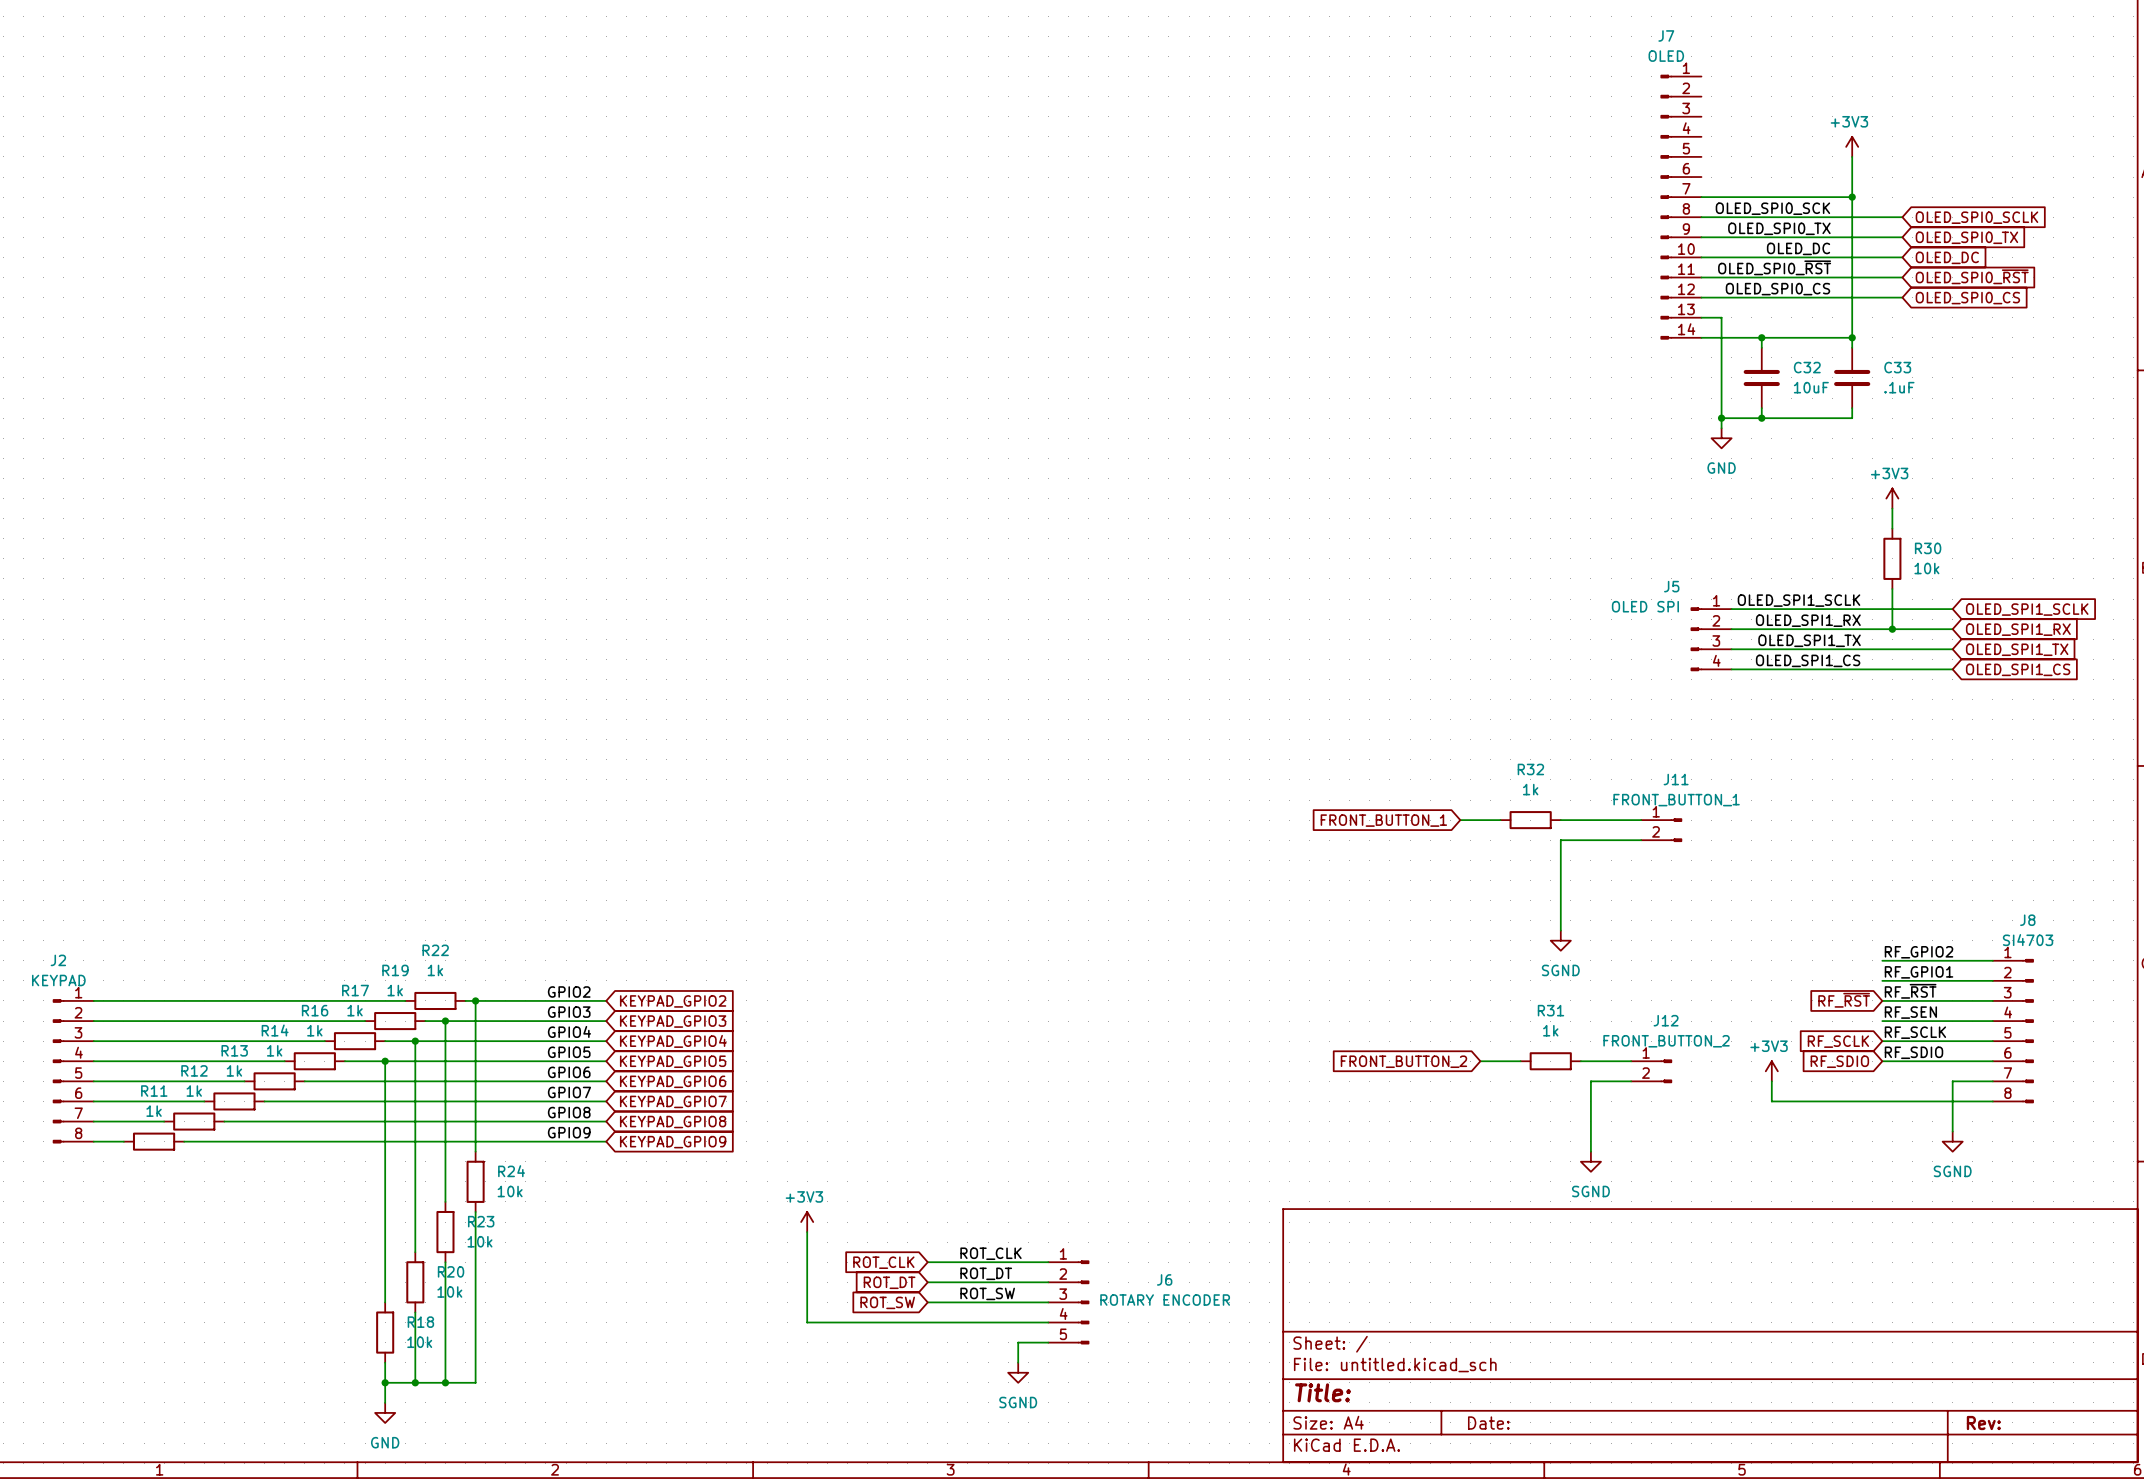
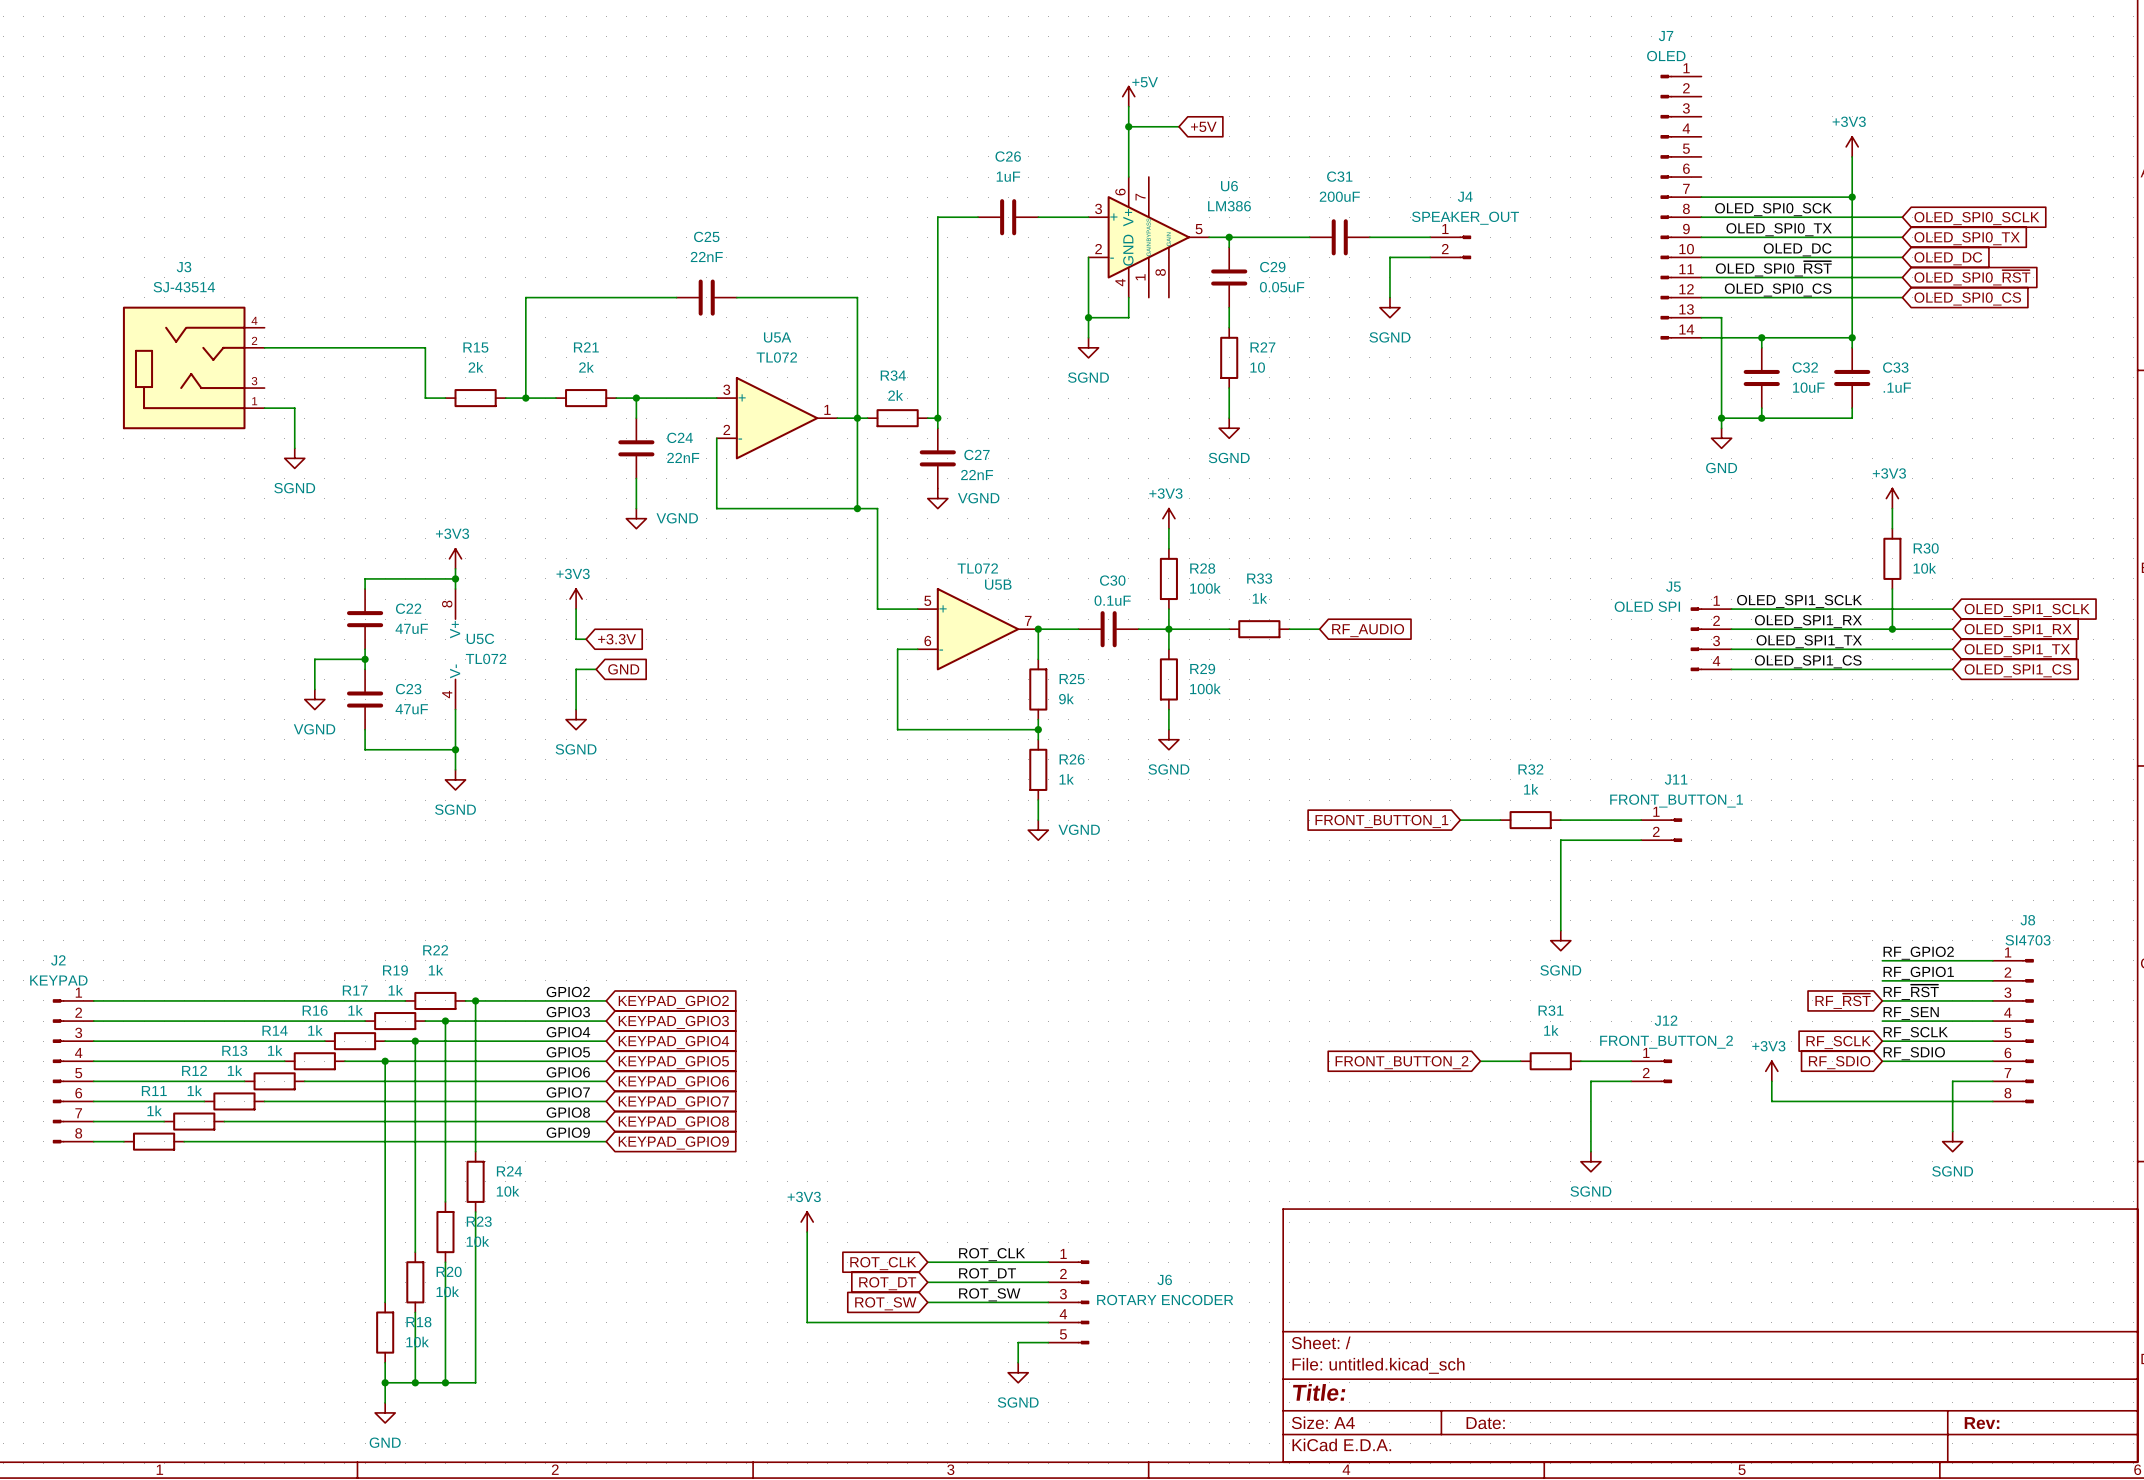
power symbol: none -> +5V (1128, 96)
wire: none -> (1128, 106) (1128, 177)
wire: none -> (1128, 126) (1178, 126)
junction: none -> (1128, 126)
global label: none -> +5V (1203, 126)
wire: none -> (978, 217) (937, 217) (937, 428)
C26: none -> 1uF (1008, 217)
wire: none -> (1038, 217) (1088, 217)
U6: none -> LM386 (1148, 237)
wire: none -> (1209, 237) (1309, 237)
wire: none -> (1229, 237) (1229, 247)
junction: none -> (1229, 237)
C31: none -> 200uF (1339, 237)
wire: none -> (1369, 237) (1430, 237)
J4: none -> SPEAKER_OUT (1450, 247)
wire: none -> (1088, 257) (1088, 337)
wire: none -> (1430, 257) (1389, 257) (1389, 297)
C29: none -> 0.05uF (1229, 277)
wire: none -> (676, 297) (525, 297) (525, 398)
C25: none -> 22nF (706, 297)
wire: none -> (736, 297) (857, 297) (857, 508)
wire: none -> (1128, 297) (1128, 317) (1088, 317)
wire: none -> (1229, 307) (1229, 327)
power symbol: none -> SGND (1389, 307)
junction: none -> (1088, 317)
wire: none -> (264, 347) (425, 347) (425, 398) (445, 398)
power symbol: none -> SGND (1088, 347)
R27: none -> 10 (1229, 357)
J3: none -> SJ-43514 (193, 367)
wire: none -> (1229, 388) (1229, 418)
R15: none -> 2k (475, 398)
wire: none -> (505, 398) (555, 398)
junction: none -> (525, 398)
R21: none -> 2k (586, 398)
wire: none -> (616, 398) (716, 398)
wire: none -> (636, 398) (636, 418)
junction: none -> (636, 398)
wire: none -> (264, 408) (294, 408) (294, 448)
U5A: none -> TL072 (777, 418)
wire: none -> (837, 418) (867, 418)
junction: none -> (857, 418)
R34: none -> 2k (897, 418)
wire: none -> (927, 418) (937, 418)
junction: none -> (937, 418)
power symbol: none -> SGND (1229, 428)
wire: none -> (716, 438) (716, 508) (877, 508) (877, 609) (917, 609)
C24: none -> 22nF (636, 448)
power symbol: none -> SGND (294, 458)
C27: none -> 22nF (937, 458)
wire: none -> (636, 478) (636, 508)
power symbol: none -> VGND (937, 498)
junction: none -> (857, 508)
power symbol: none -> VGND (636, 518)
power symbol: none -> +3V3 (1168, 518)
wire: none -> (1168, 528) (1168, 548)
power symbol: none -> +3V3 (455, 558)
wire: none -> (455, 568) (455, 588)
wire: none -> (455, 578) (365, 578) (365, 588)
junction: none -> (455, 578)
R28: none -> 100k (1168, 578)
power symbol: none -> +3V3 (576, 599)
wire: none -> (576, 609) (576, 639) (586, 639)
wire: none -> (1168, 609) (1168, 649)
C22: none -> 47uF (365, 619)
U5B: none -> TL072 (978, 629)
junction: none -> (1038, 629)
wire: none -> (1078, 629) (1038, 629) (1038, 659)
C30: none -> 0.1uF (1108, 629)
wire: none -> (1138, 629) (1229, 629)
junction: none -> (1168, 629)
R33: none -> 1k (1259, 629)
wire: none -> (1289, 629) (1319, 629)
global label: none -> RF_AUDIO (1368, 630)
global label: none -> +3.3V (617, 639)
wire: none -> (365, 649) (365, 669)
U5C: none -> TL072 (455, 649)
wire: none -> (917, 649) (897, 649) (897, 729) (1038, 729)
wire: none -> (365, 659) (314, 659) (314, 689)
junction: none -> (365, 659)
wire: none -> (596, 669) (576, 669) (576, 709)
global label: none -> GND (623, 669)
R29: none -> 100k (1168, 679)
R25: none -> 9k (1038, 689)
power symbol: none -> VGND (314, 699)
C23: none -> 47uF (365, 699)
wire: none -> (455, 709) (455, 769)
wire: none -> (1168, 709) (1168, 729)
power symbol: none -> SGND (576, 719)
wire: none -> (1038, 719) (1038, 739)
wire: none -> (365, 729) (365, 749) (455, 749)
junction: none -> (1038, 729)
power symbol: none -> SGND (1168, 739)
junction: none -> (455, 749)
R26: none -> 1k (1038, 769)
power symbol: none -> SGND (455, 779)
wire: none -> (1038, 800) (1038, 820)
power symbol: none -> VGND (1038, 830)

